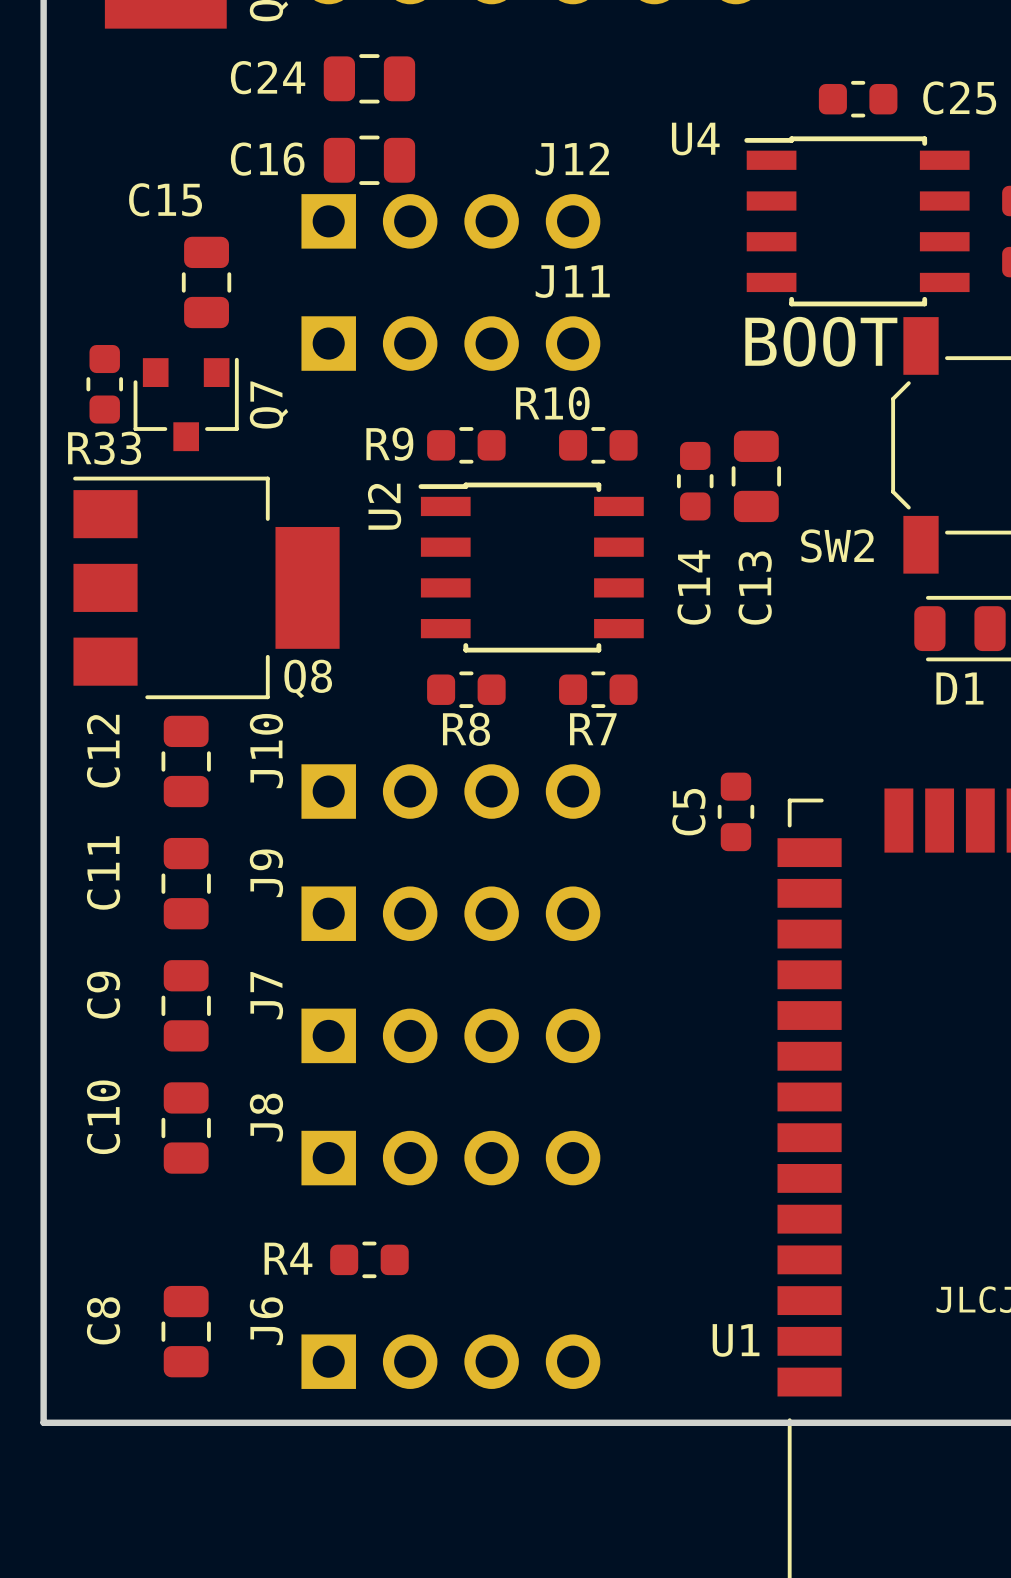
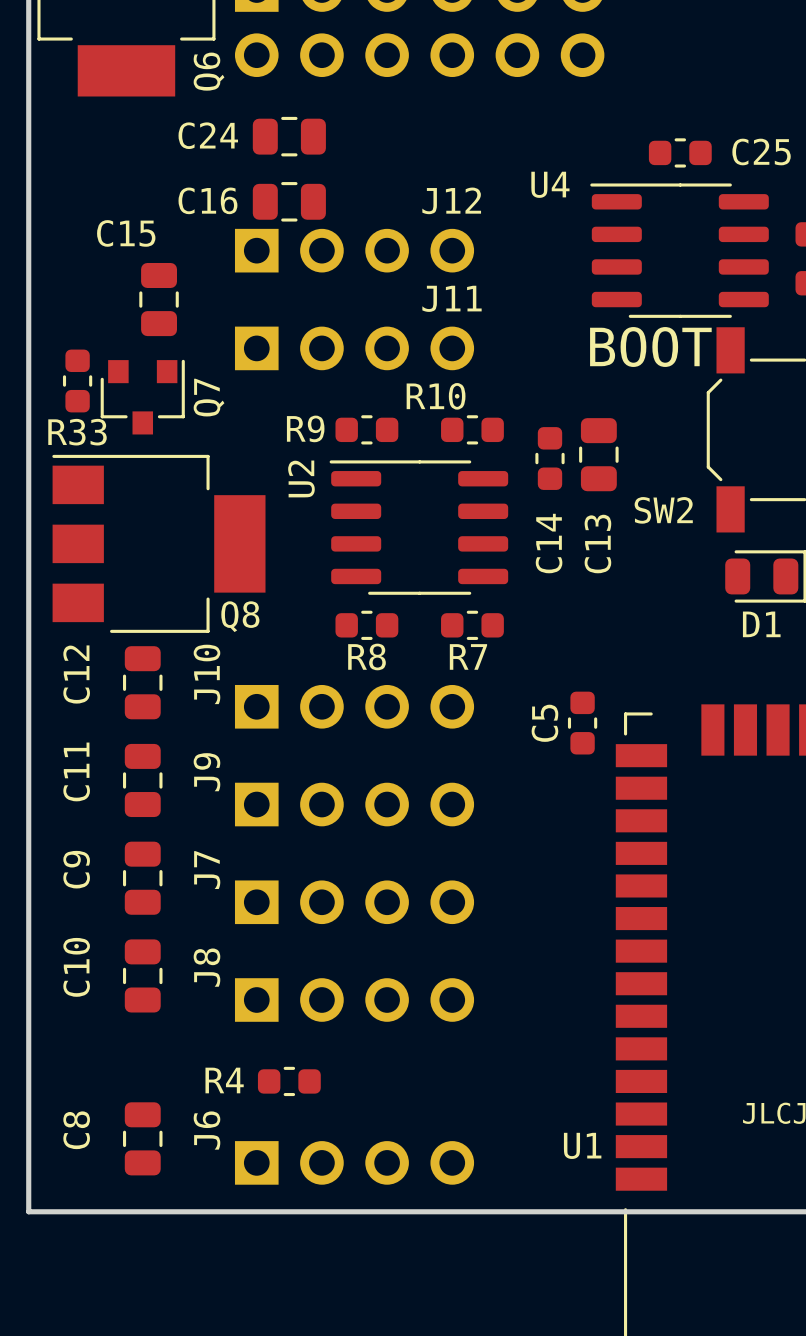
U4 footprint: [744, 136, 970, 307] -> [590, 183, 769, 318]
U2 footprint: [418, 482, 644, 653] -> [329, 460, 509, 595]

